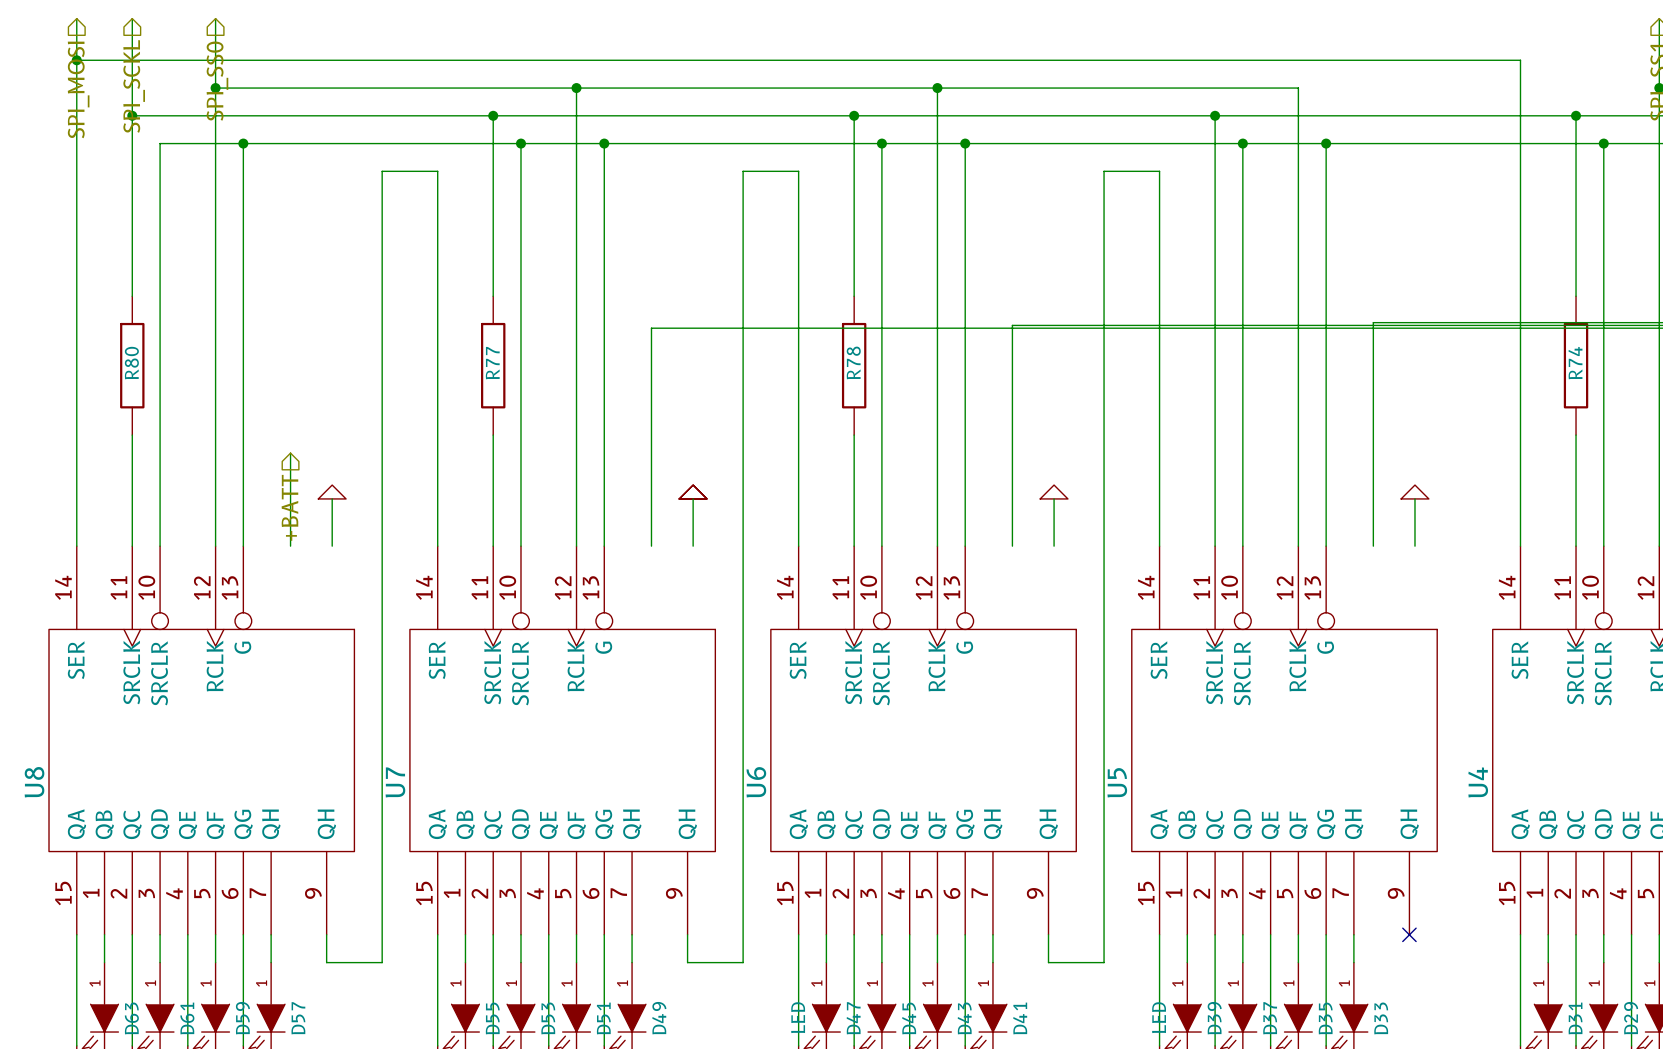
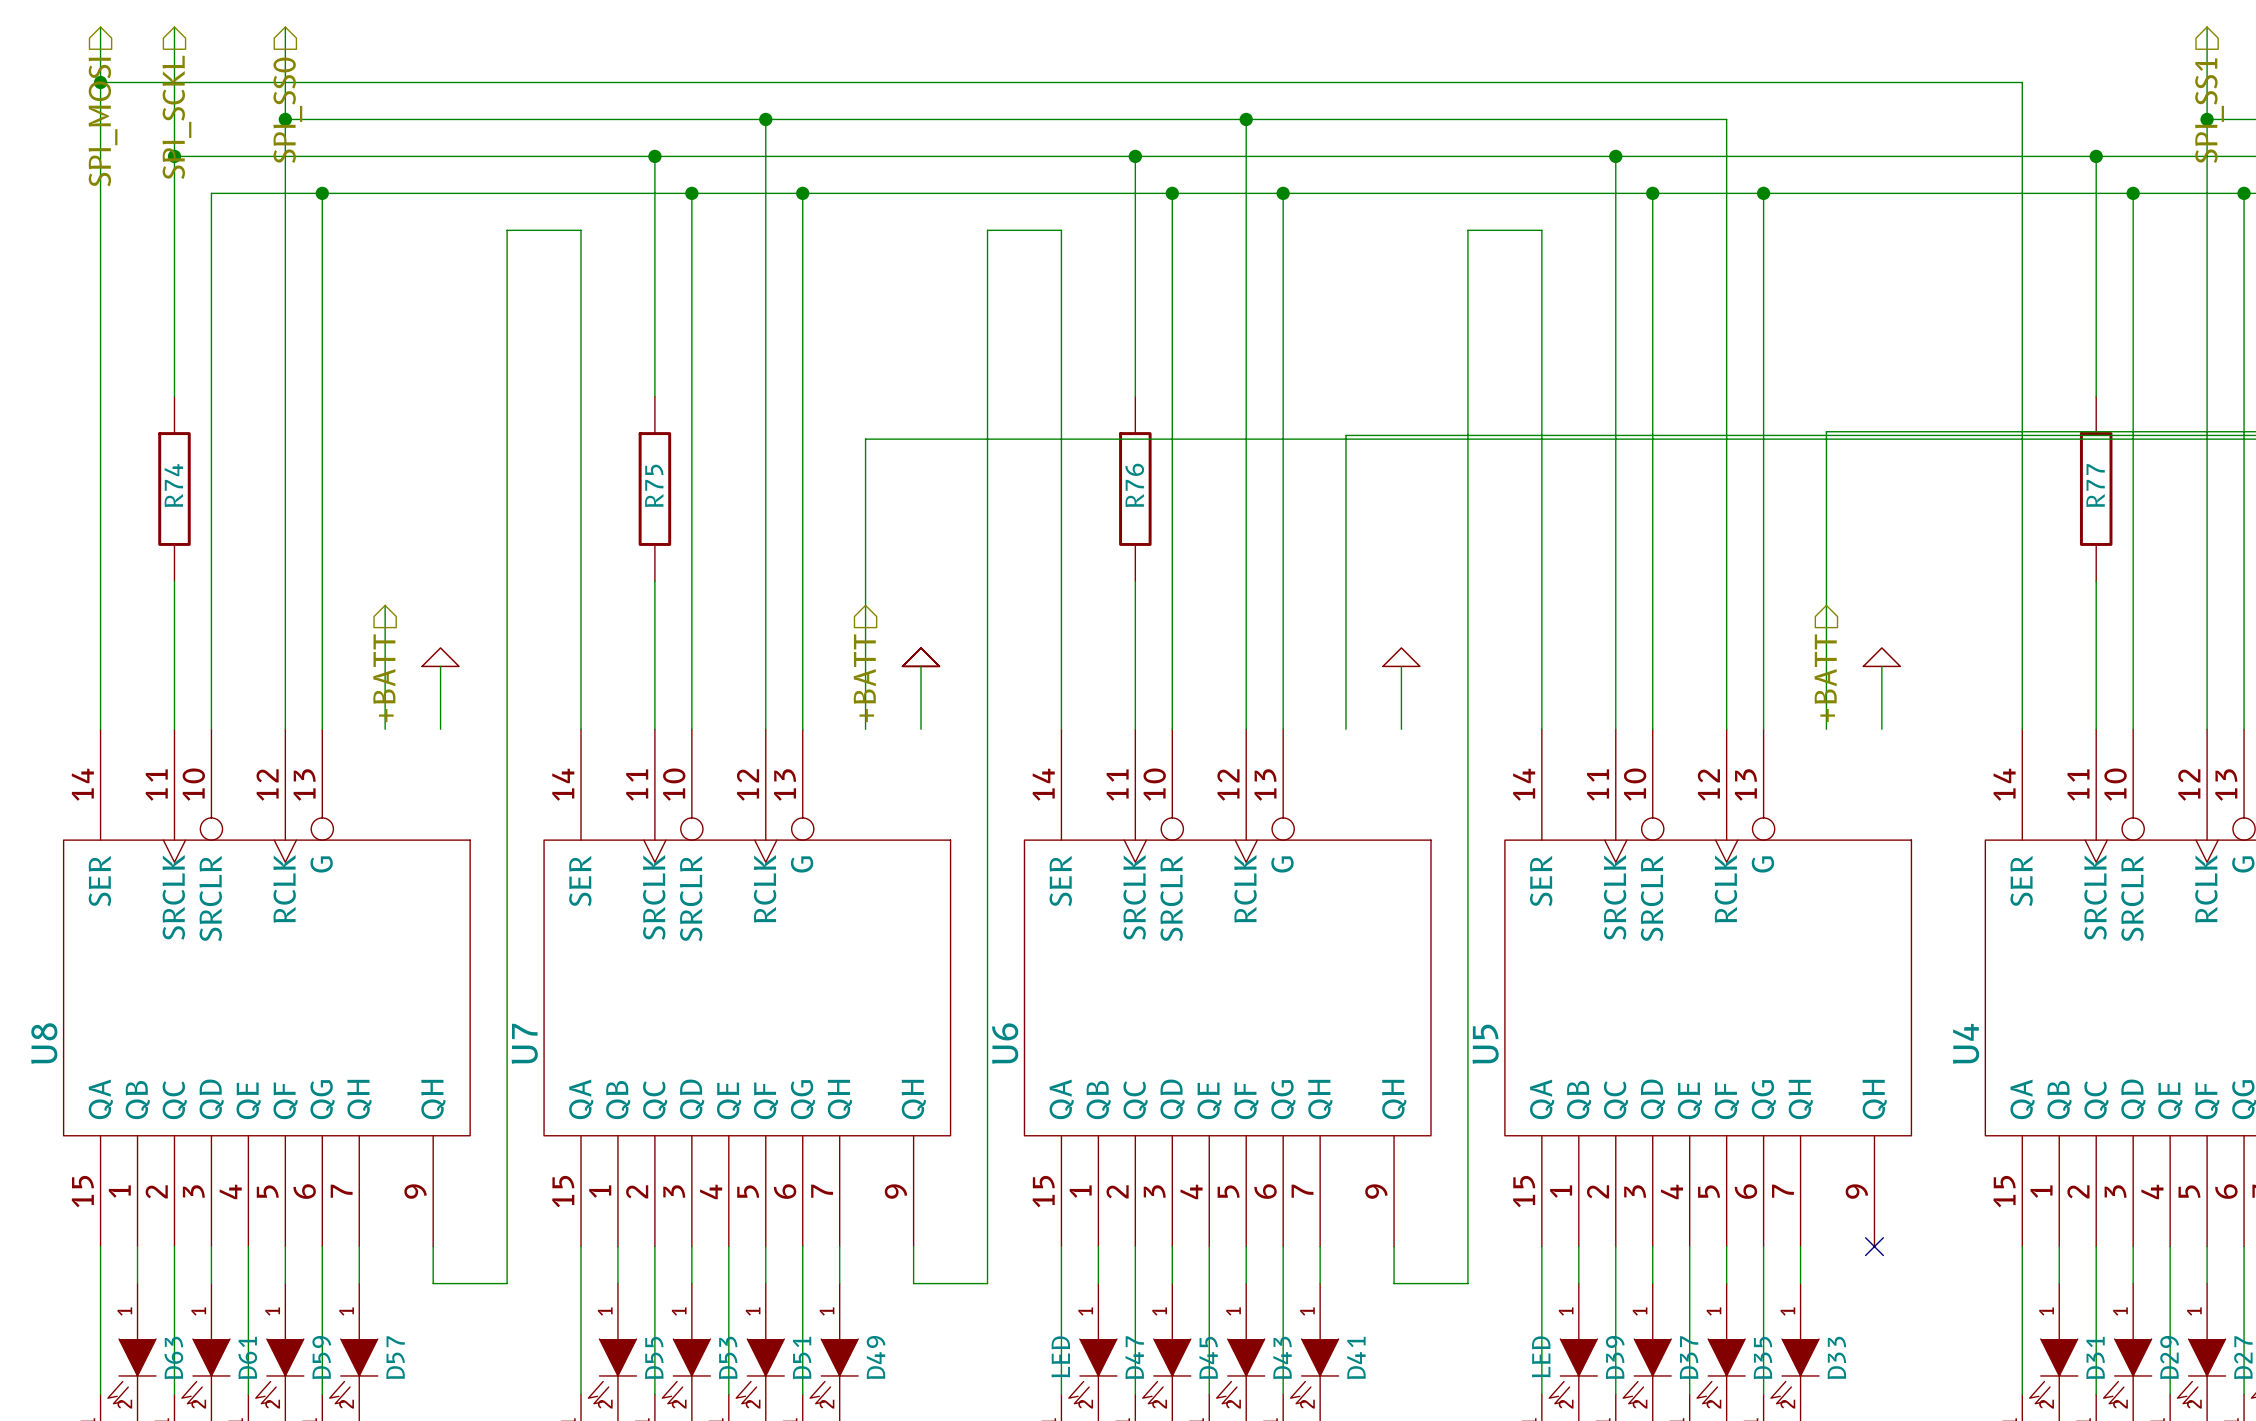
R78 name: R78 (853, 362) -> R76 (1134, 485)
R80 name: R80 (131, 363) -> R74 (173, 485)
R77 name: R77 (492, 363) -> R75 (654, 485)
R74 name: R74 (1575, 363) -> R77 (2095, 485)
hierarchical label: none -> +BATT (864, 678)
hierarchical label: none -> +BATT (1825, 678)

